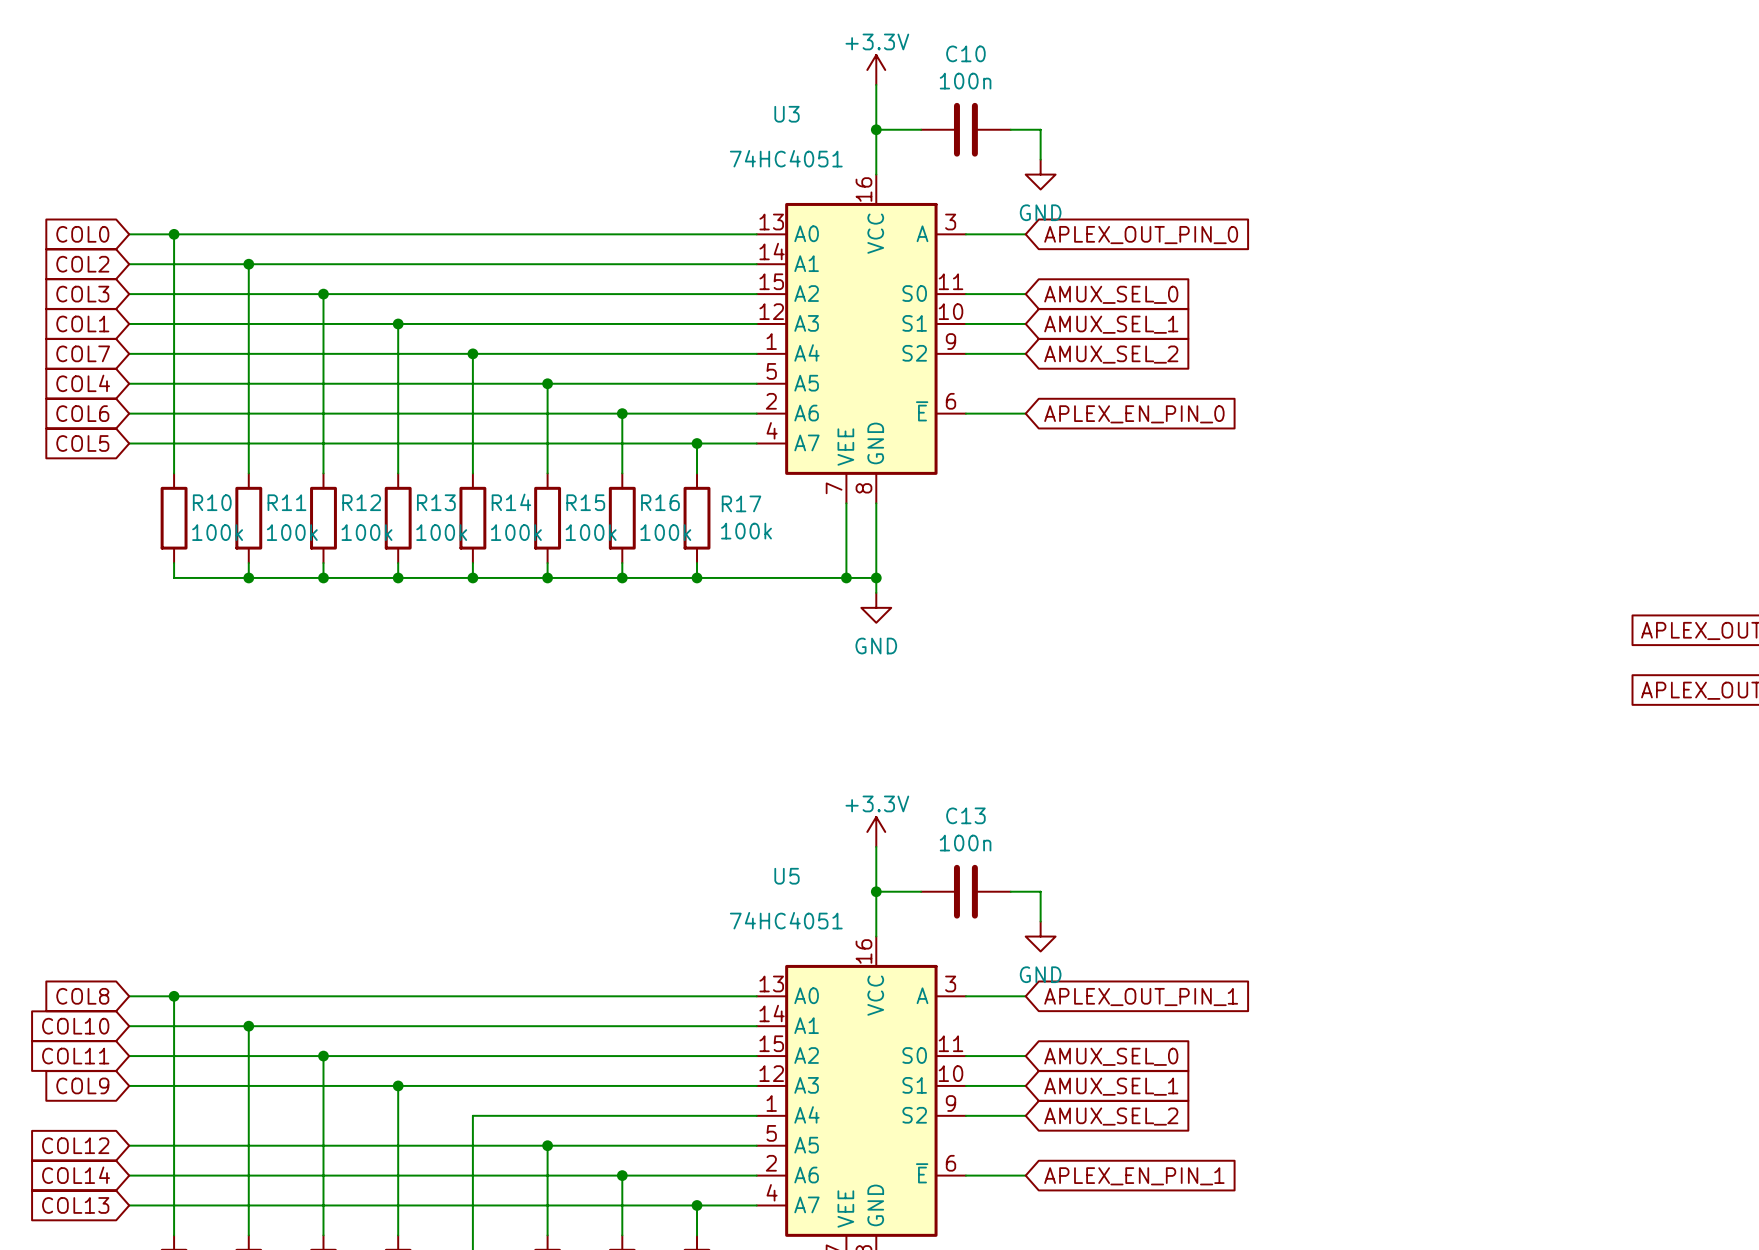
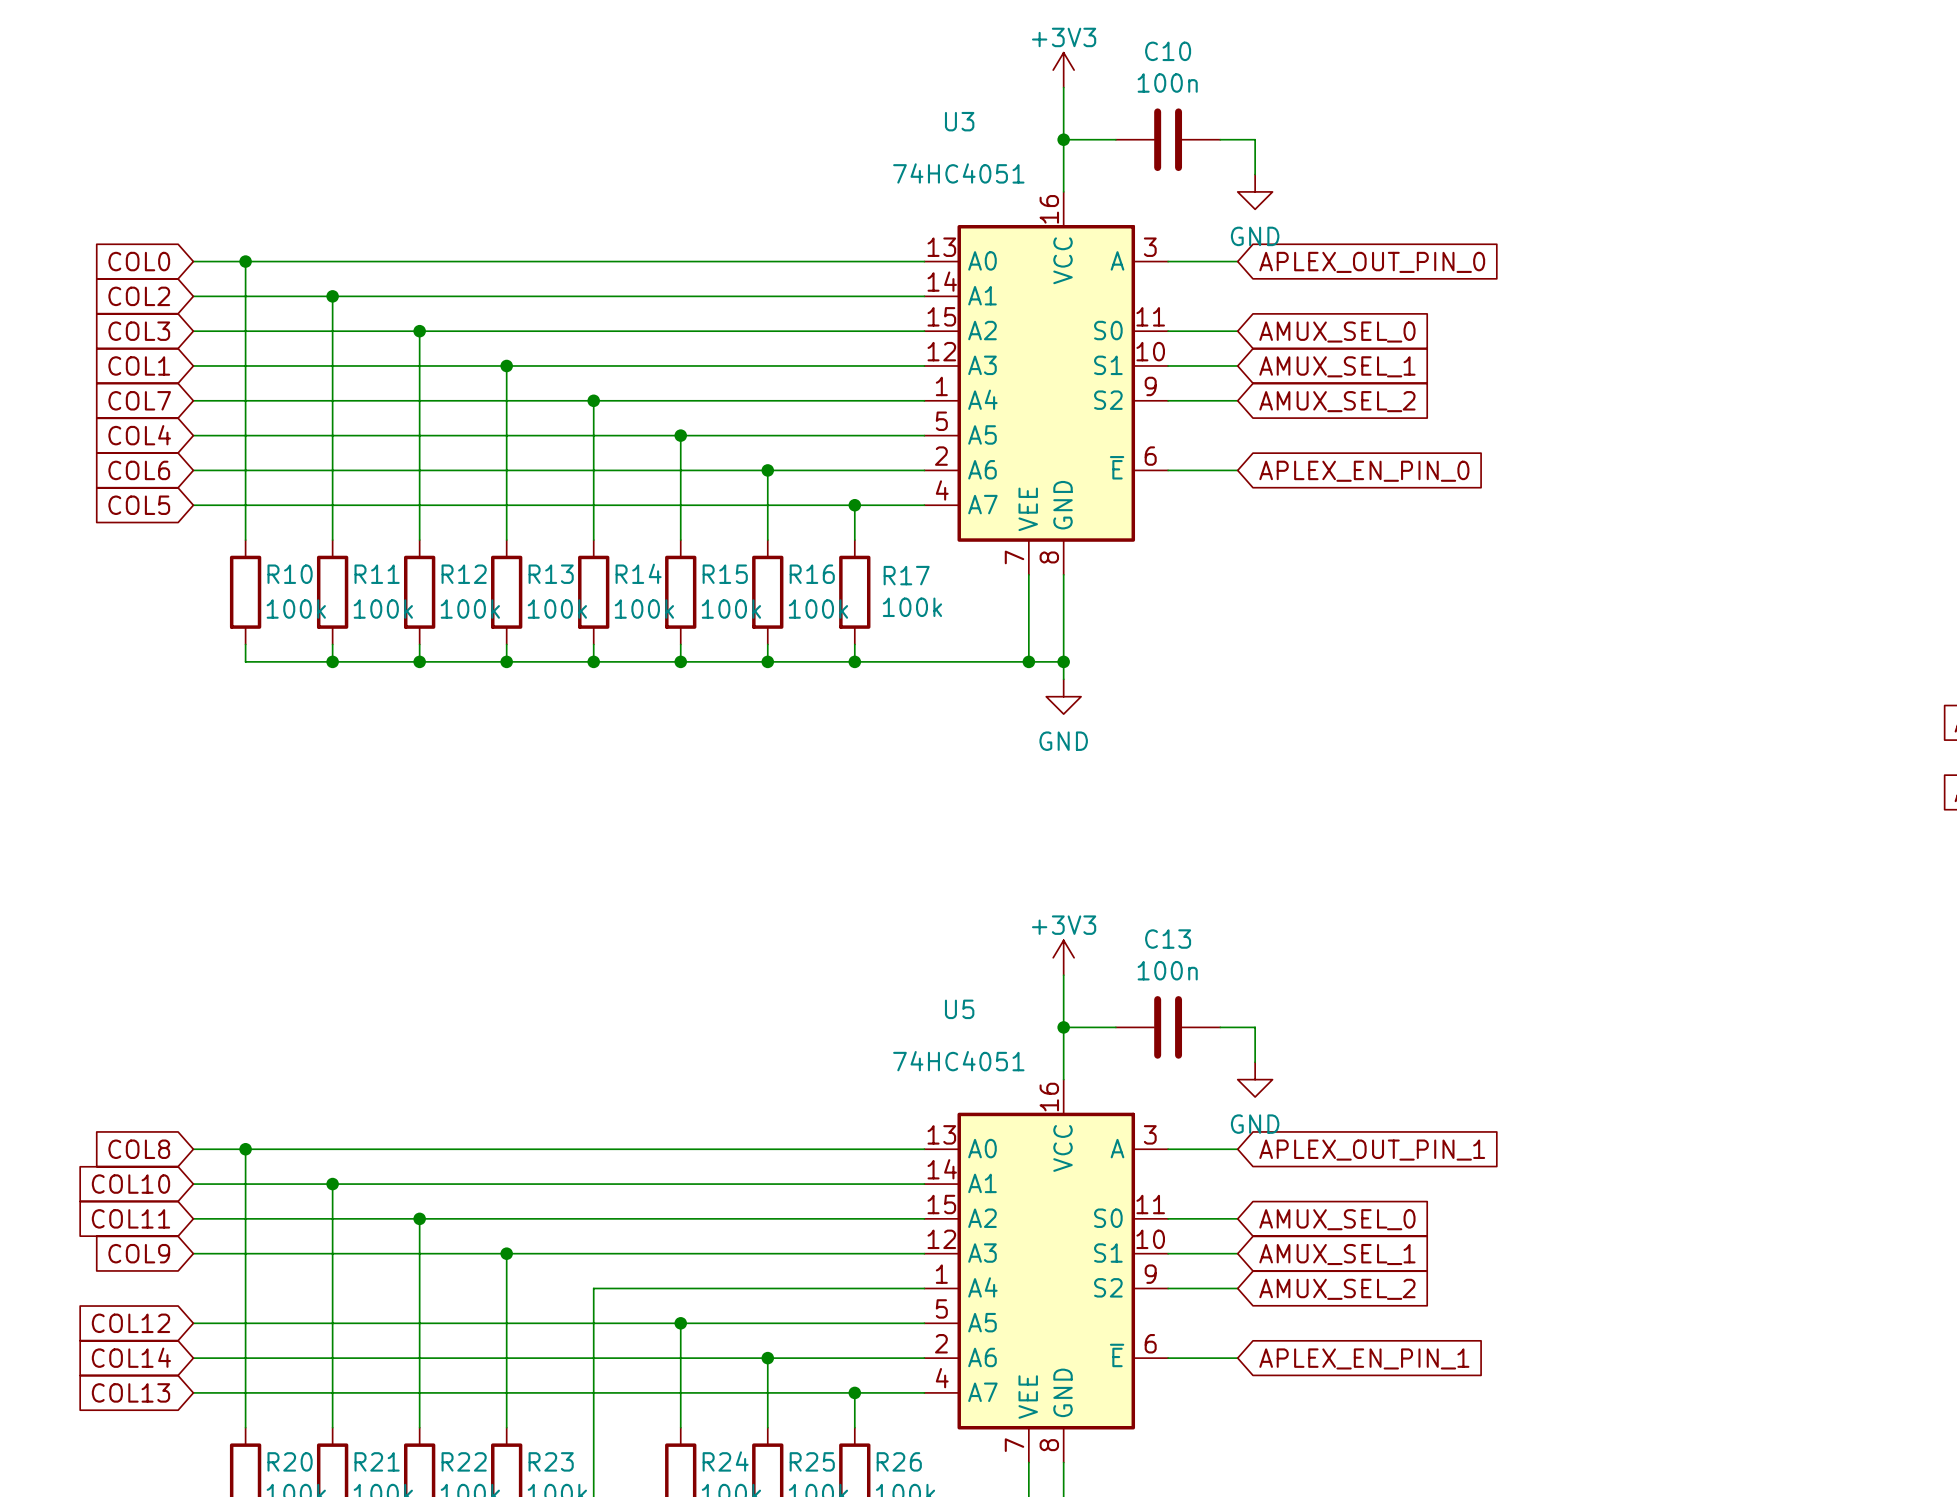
power symbol: +3.3V (876, 69) -> +3V3 (1063, 70)
power symbol: +3.3V (876, 831) -> +3V3 (1063, 957)

